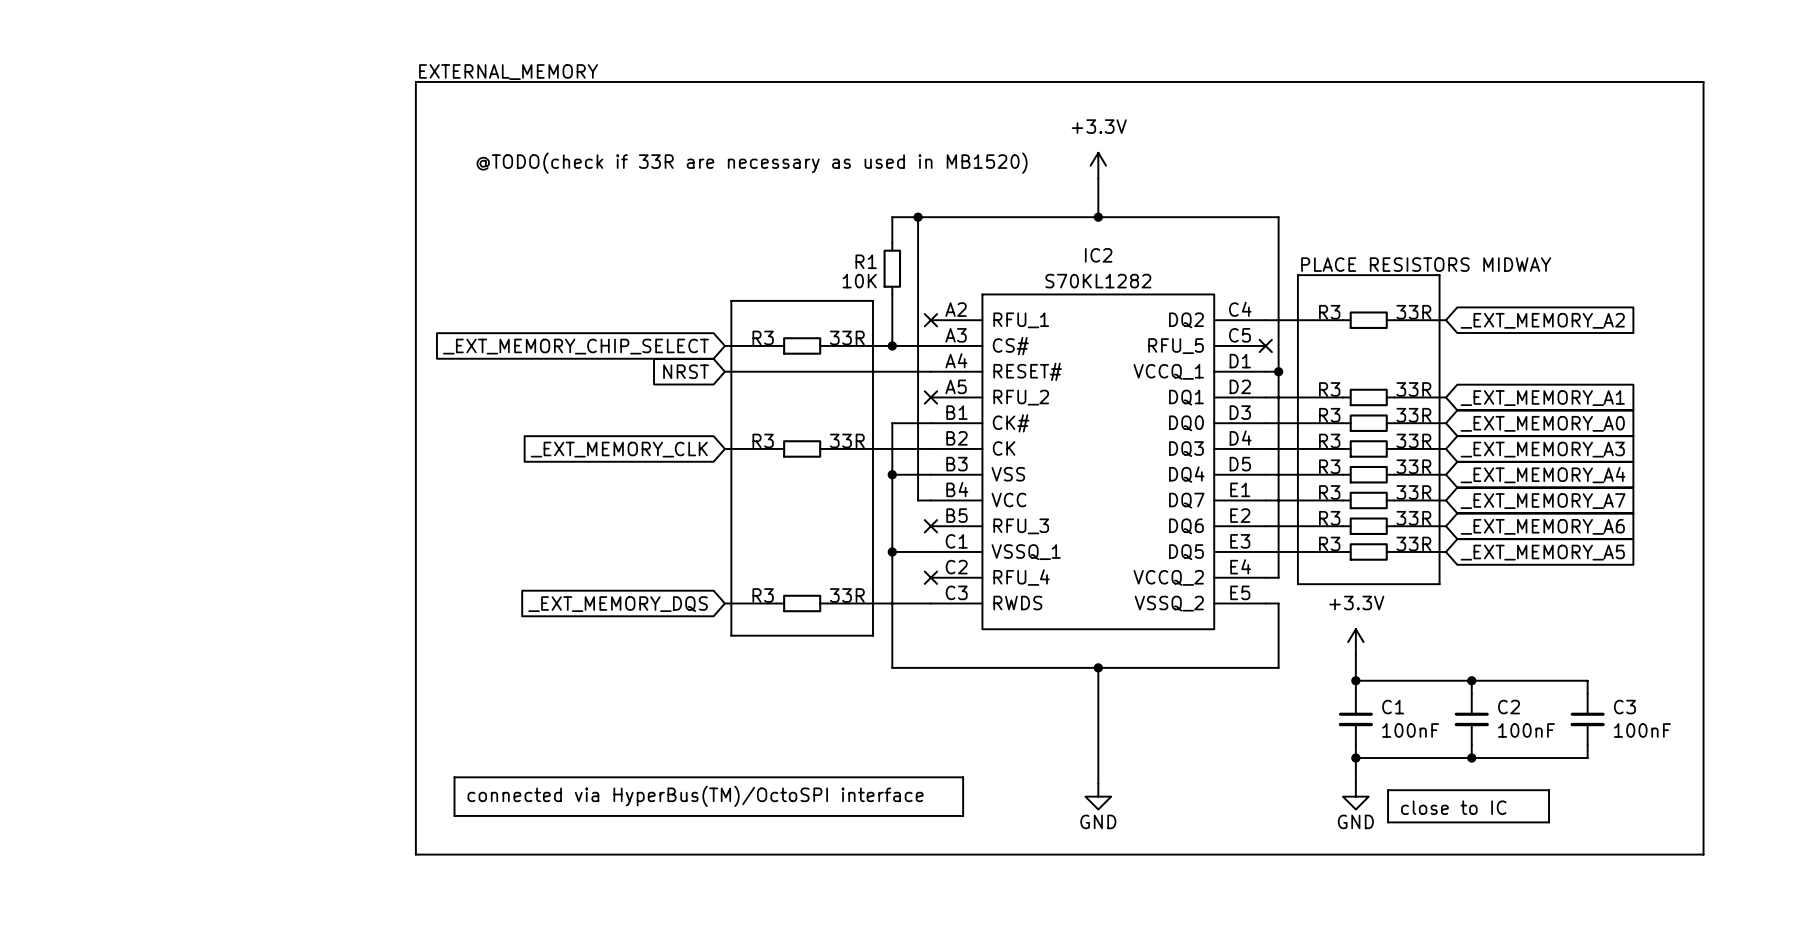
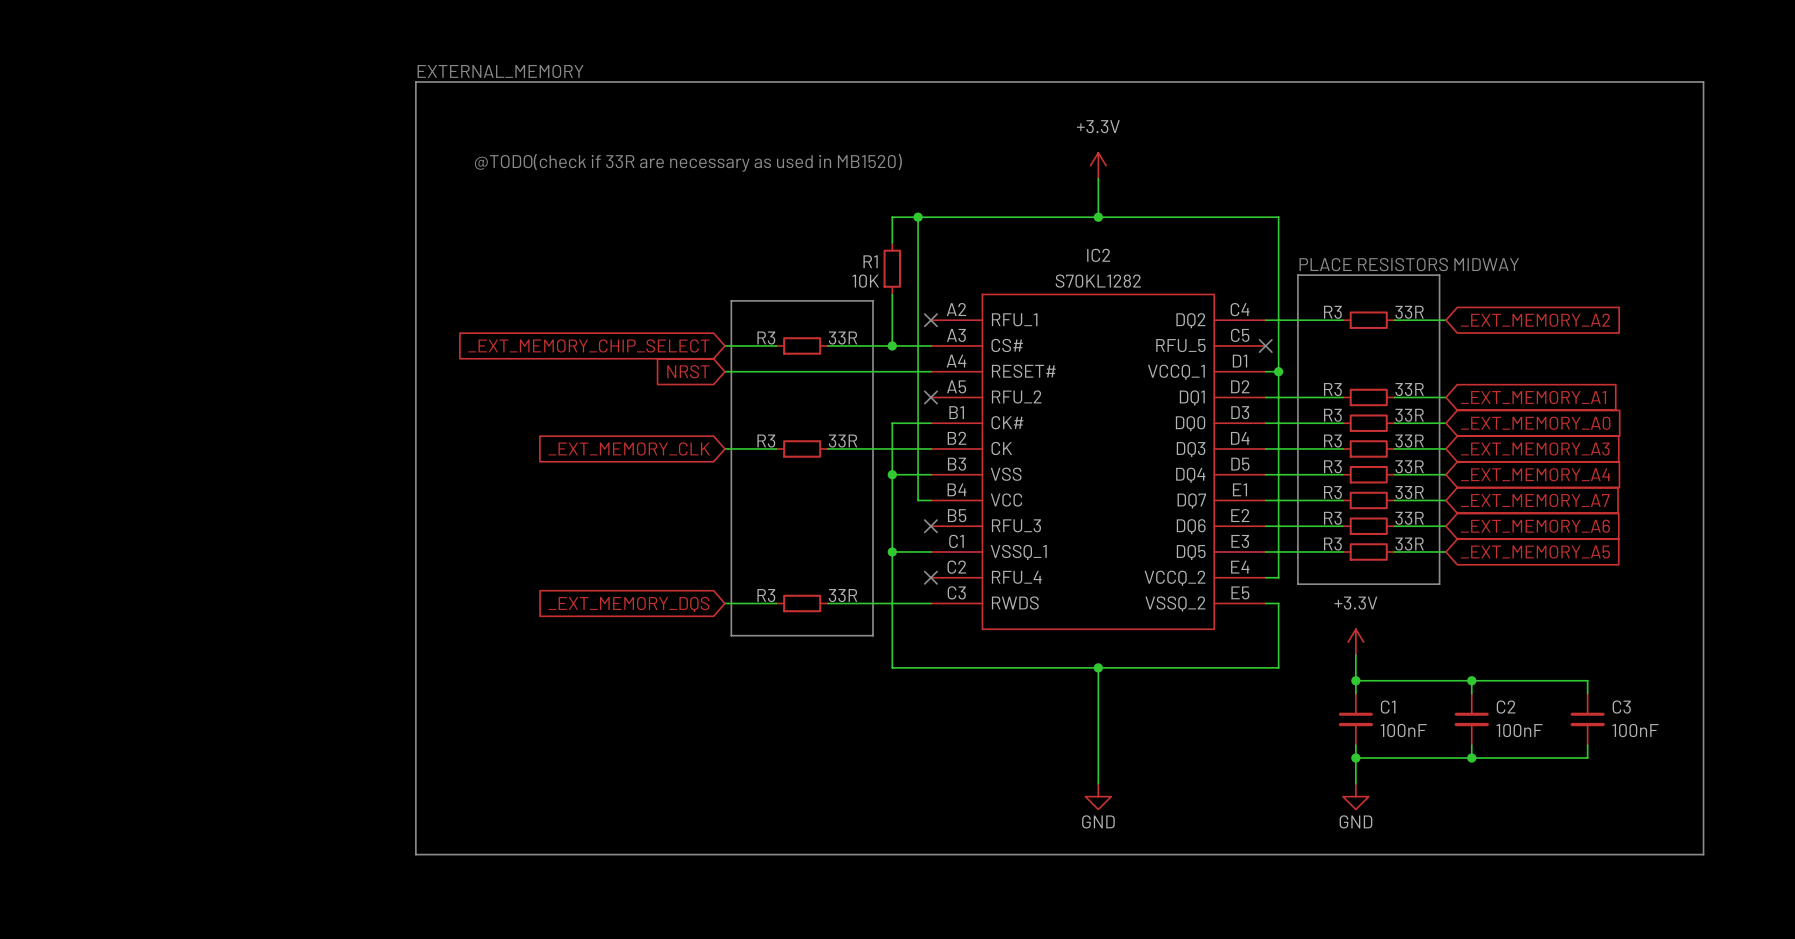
line: (454, 777) (963, 777) (963, 815) (454, 815) (454, 777) -> none
line: (1388, 790) (1549, 790) (1549, 822) (1388, 822) (1388, 790) -> none
text: connected via HyperBus(TM)/OctoSPI interface (695, 796) -> none
text: close to IC (1453, 807) -> none

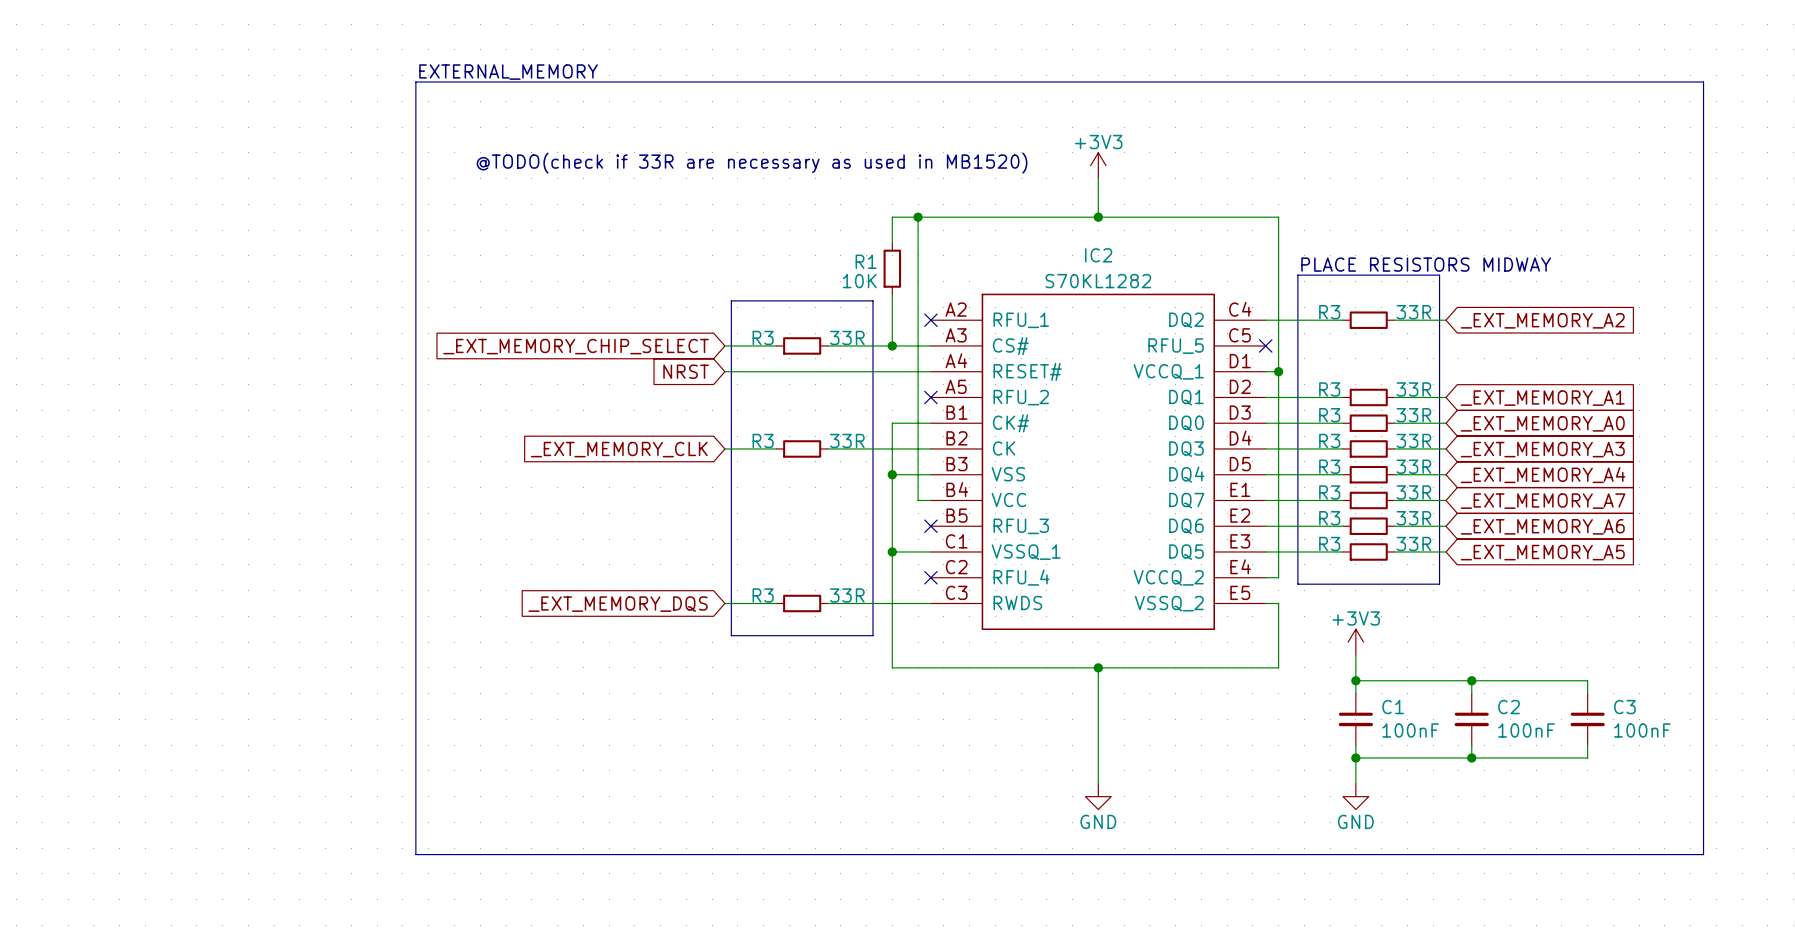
power symbol: +3.3V (1098, 165) -> +3V3 (1098, 165)
power symbol: +3.3V (1355, 642) -> +3V3 (1355, 642)

